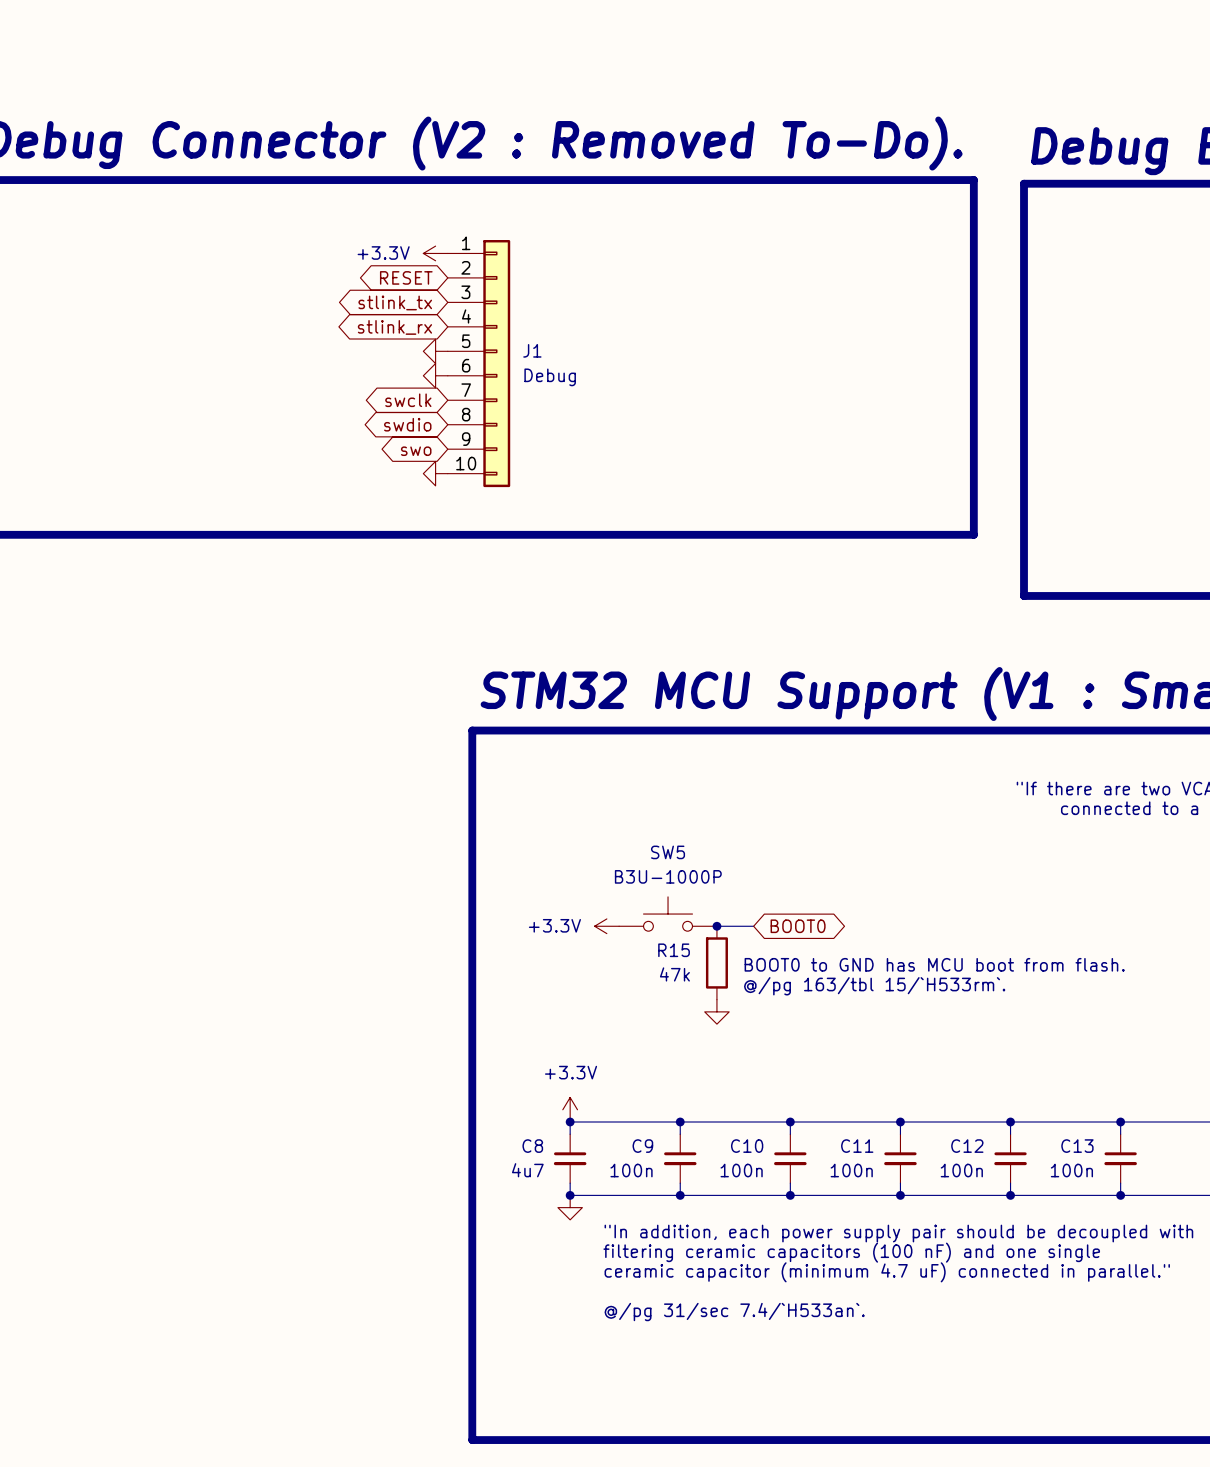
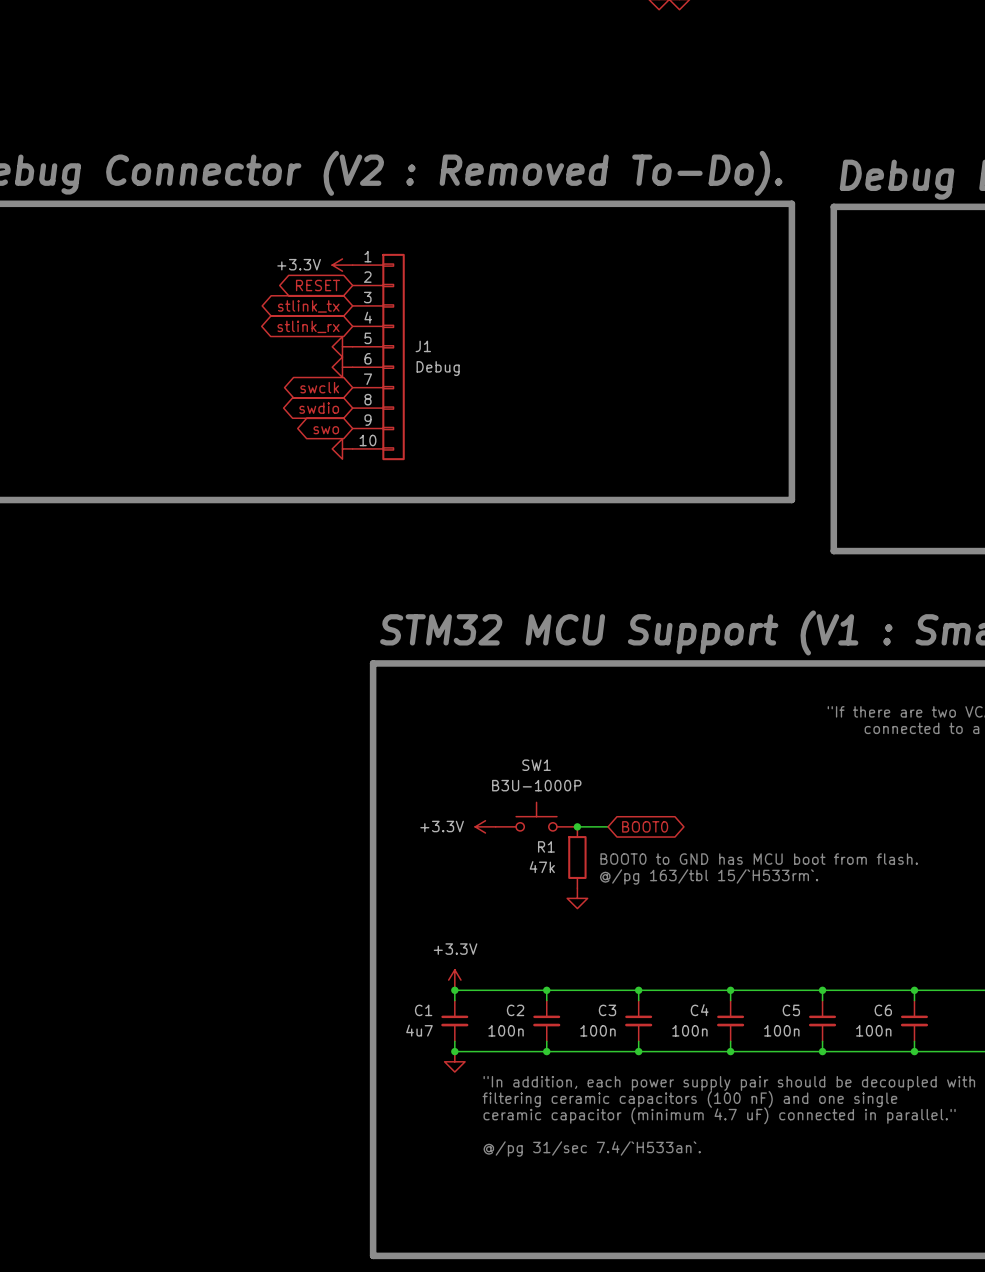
SW5 name: SW5 (668, 852) -> SW1 (536, 765)
R15 name: R15 (674, 950) -> R1 (546, 846)
C8 name: C8 (532, 1146) -> C1 (423, 1010)
C9 name: C9 (642, 1146) -> C2 (515, 1010)
C10 name: C10 (747, 1146) -> C3 (607, 1010)
C11 name: C11 (857, 1146) -> C4 (699, 1010)
C12 name: C12 (967, 1146) -> C5 (791, 1010)
C13 name: C13 (1077, 1146) -> C6 (883, 1010)

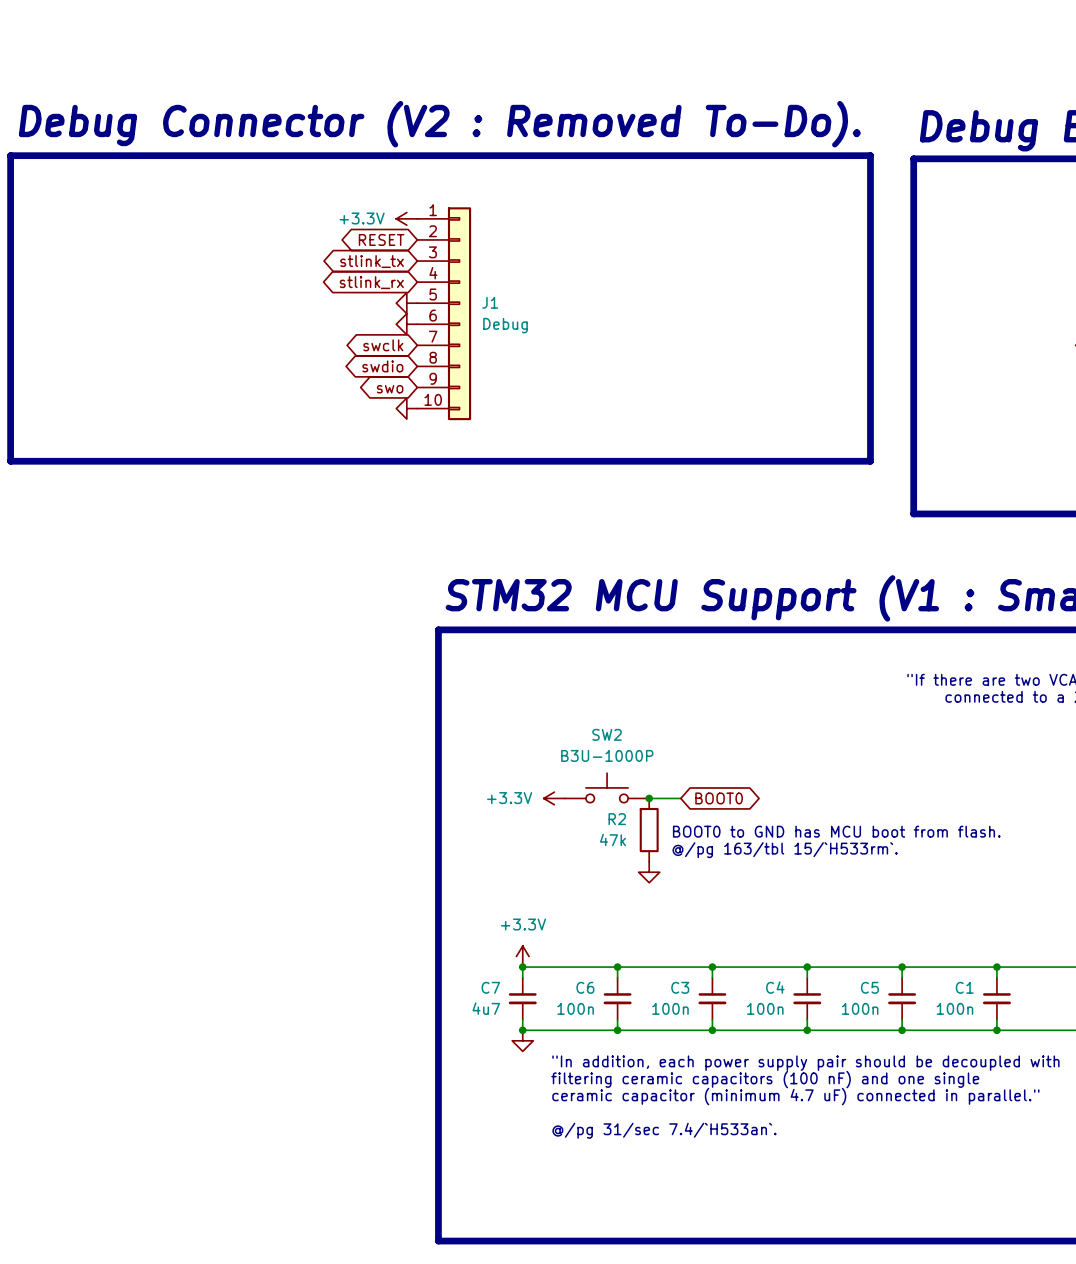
SW1 name: SW1 (536, 765) -> SW2 (607, 734)
R1 name: R1 (546, 846) -> R2 (617, 819)
C1 name: C1 (423, 1010) -> C7 (490, 987)
C2 name: C2 (515, 1010) -> C6 (585, 987)
C6 name: C6 (883, 1010) -> C1 (964, 987)

